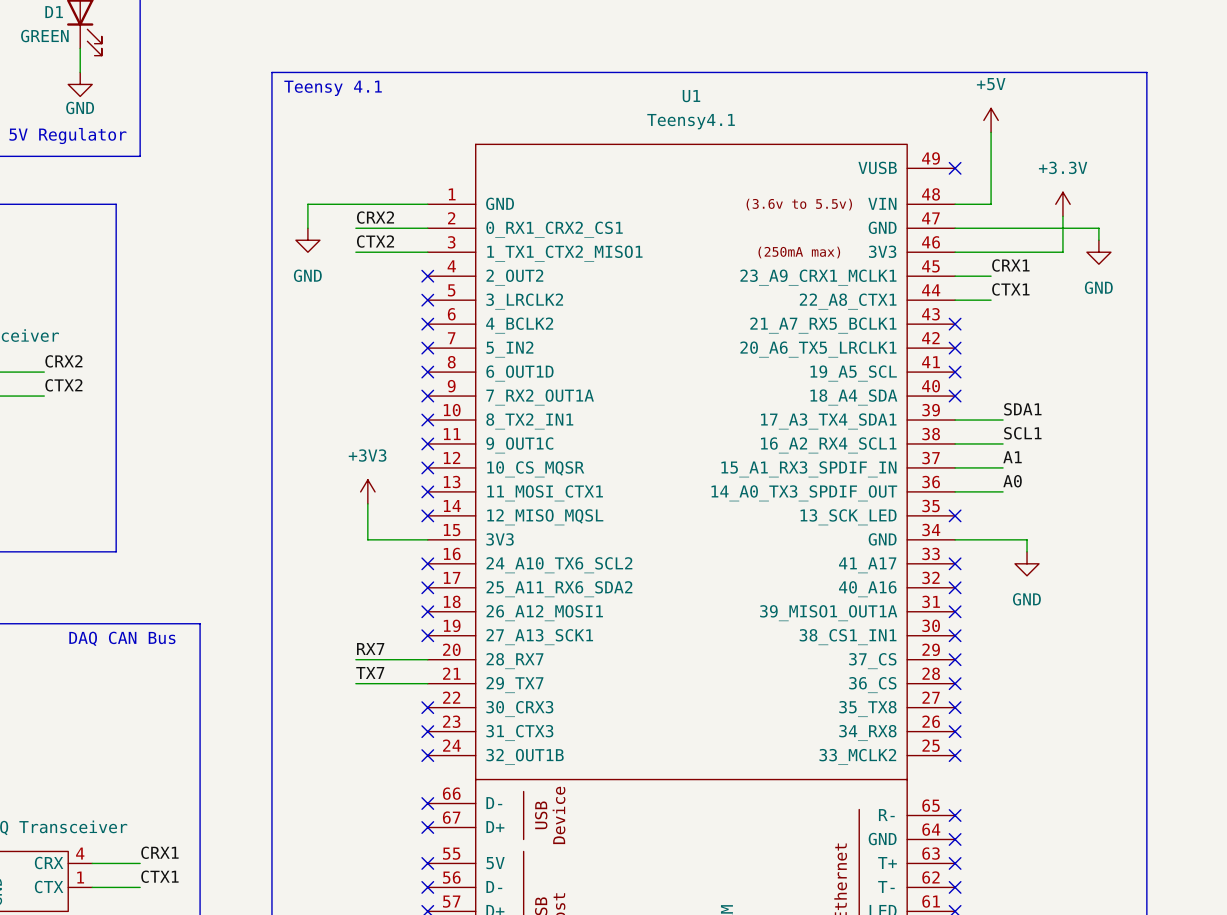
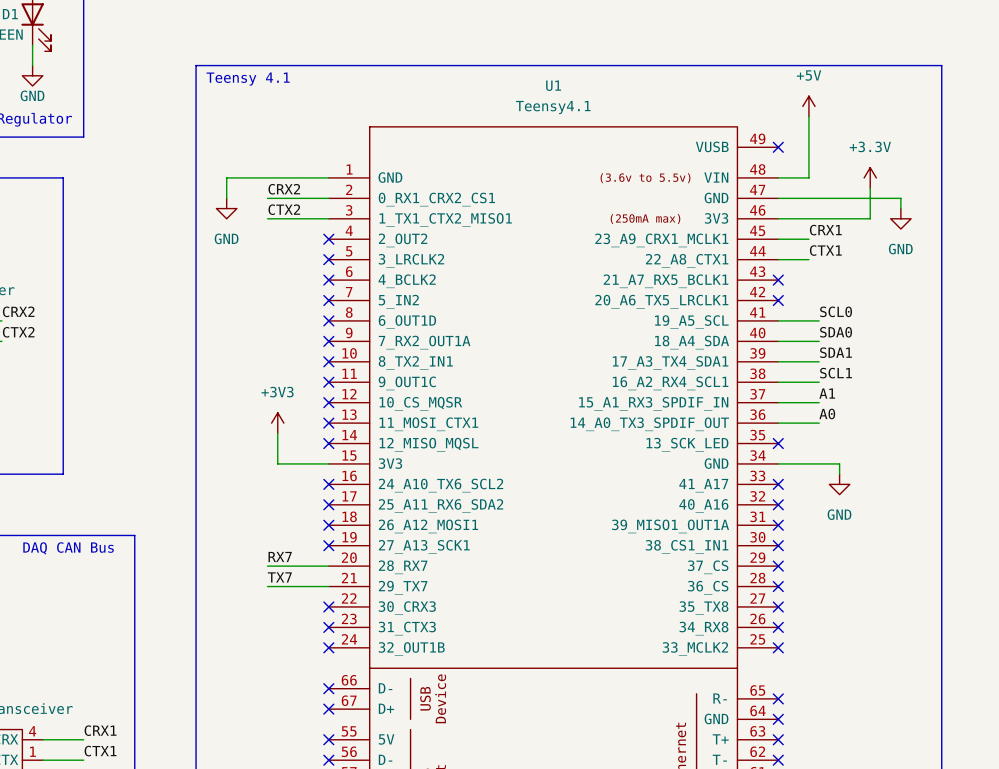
label: none -> SCL0 (836, 311)
wire: none -> (778, 320) (819, 320)
no-connect mark: (955, 372) -> none
label: none -> SDA0 (836, 332)
wire: none -> (778, 341) (819, 341)
no-connect mark: (955, 396) -> none

